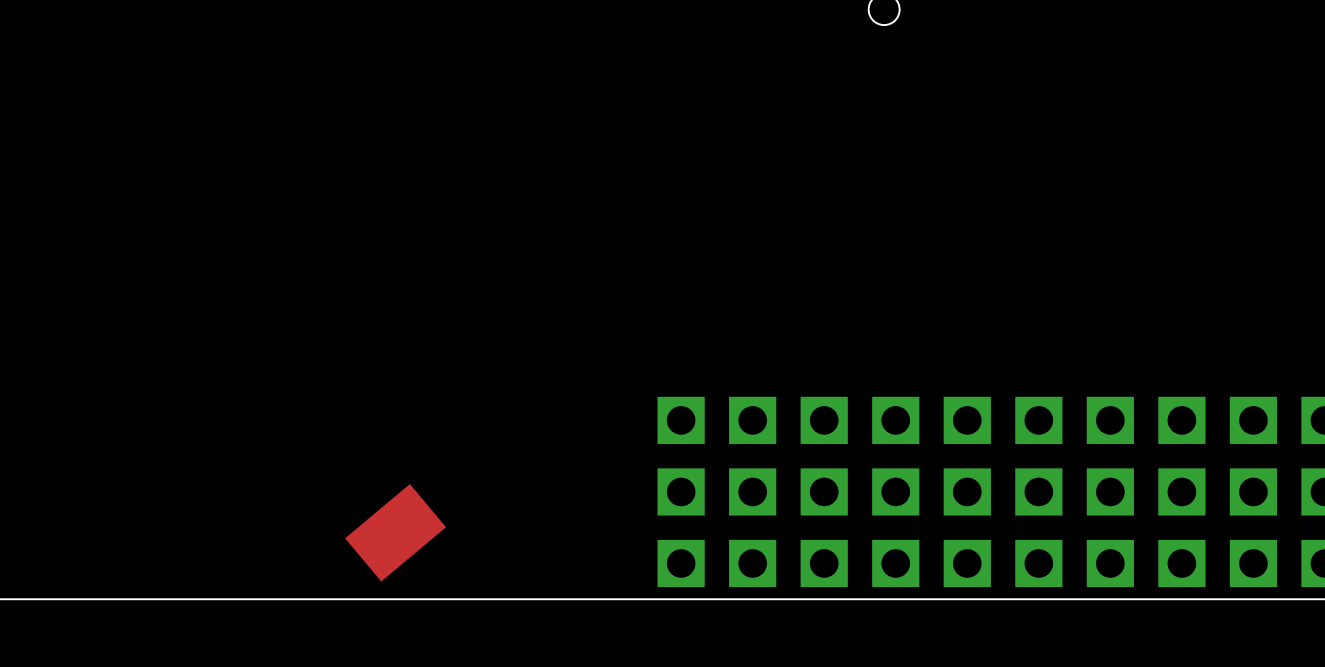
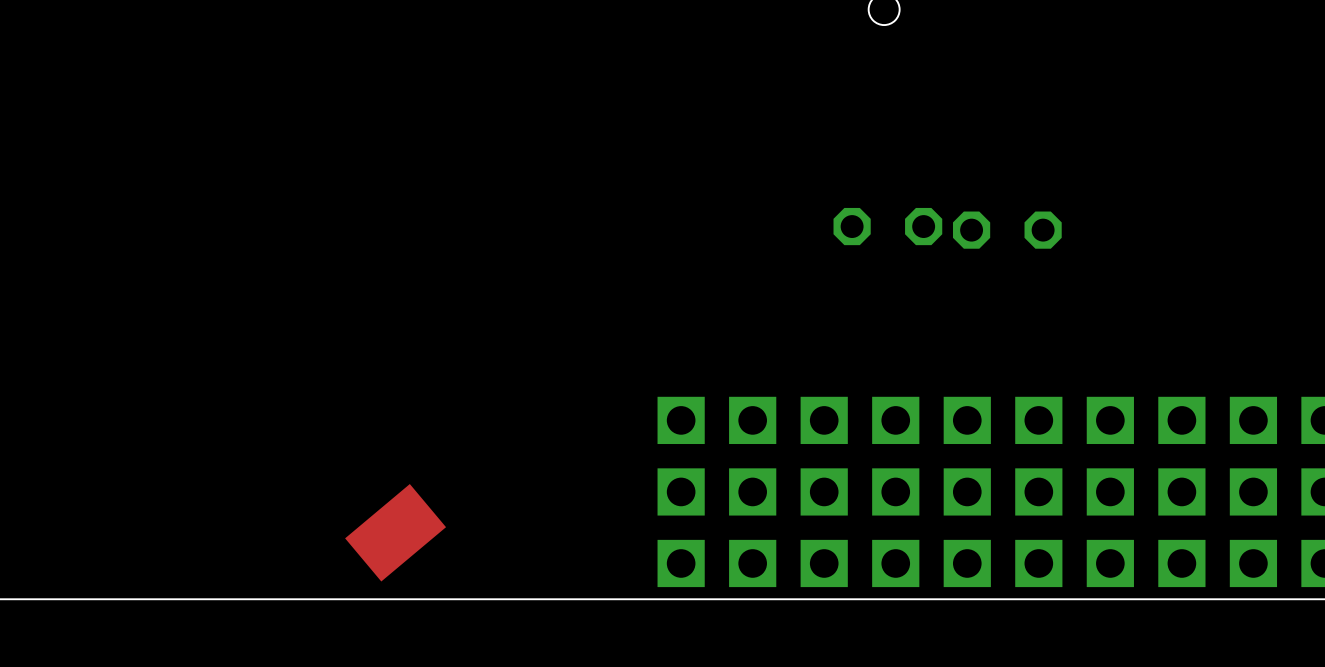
part: none -> (887, 226)
part: none -> (1007, 230)

